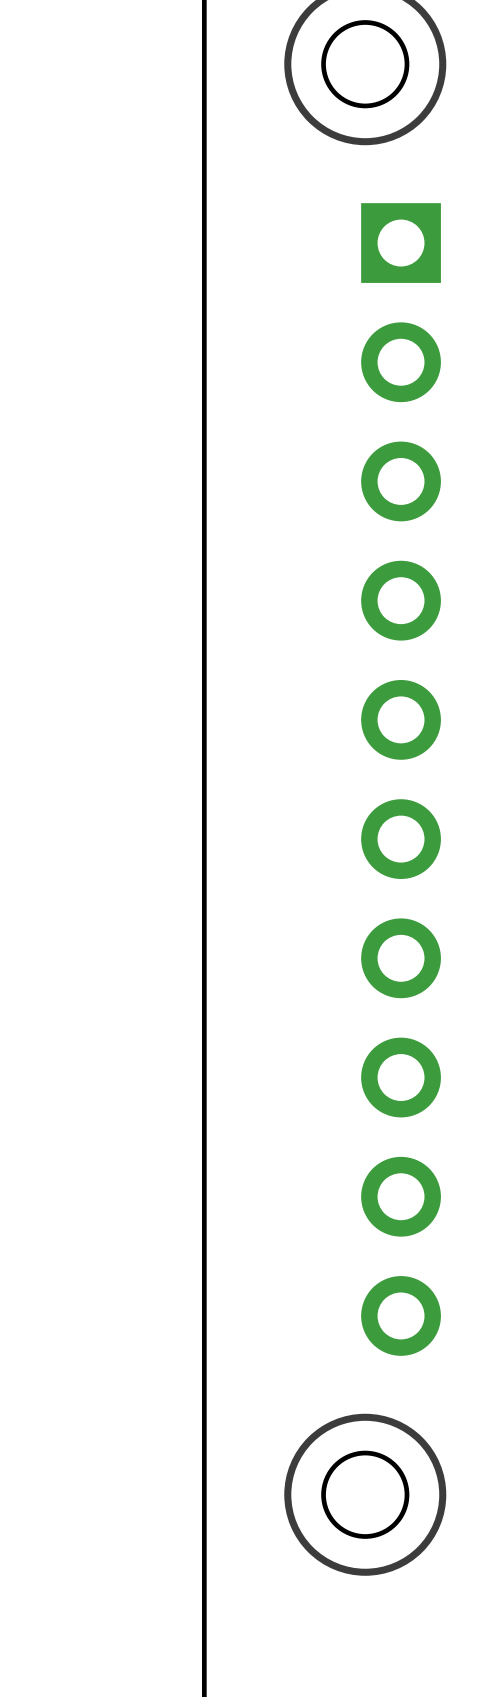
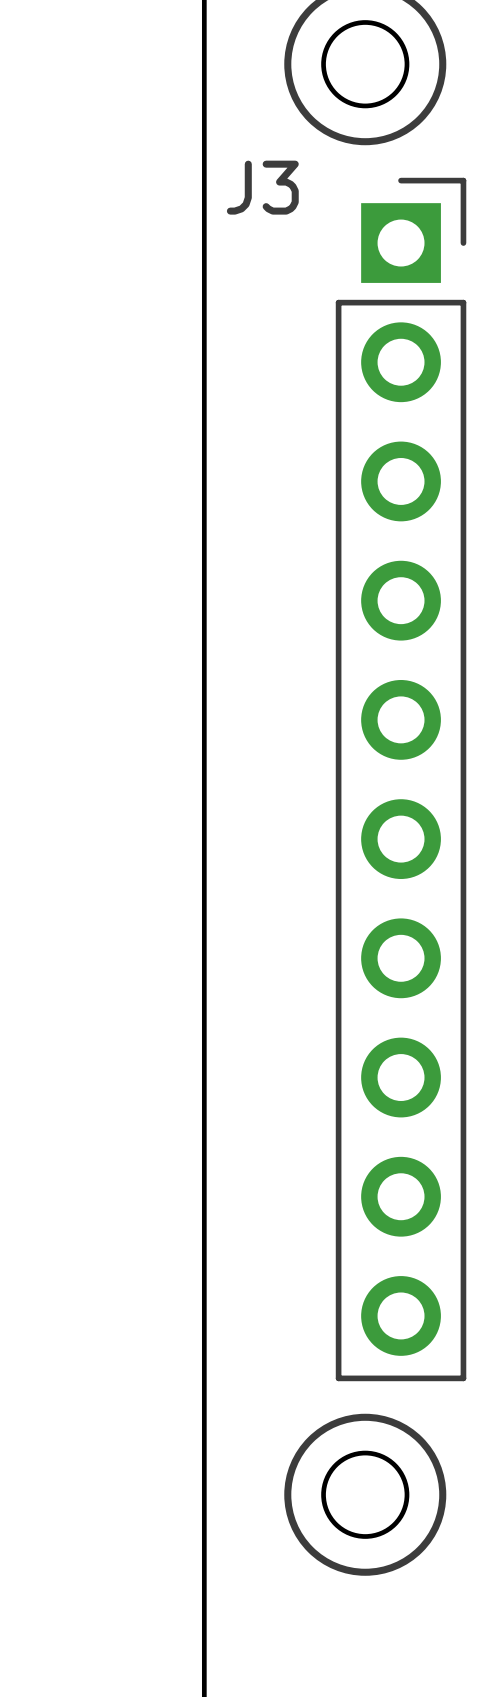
J3 side: top (401, 779) -> bottom (401, 779)

